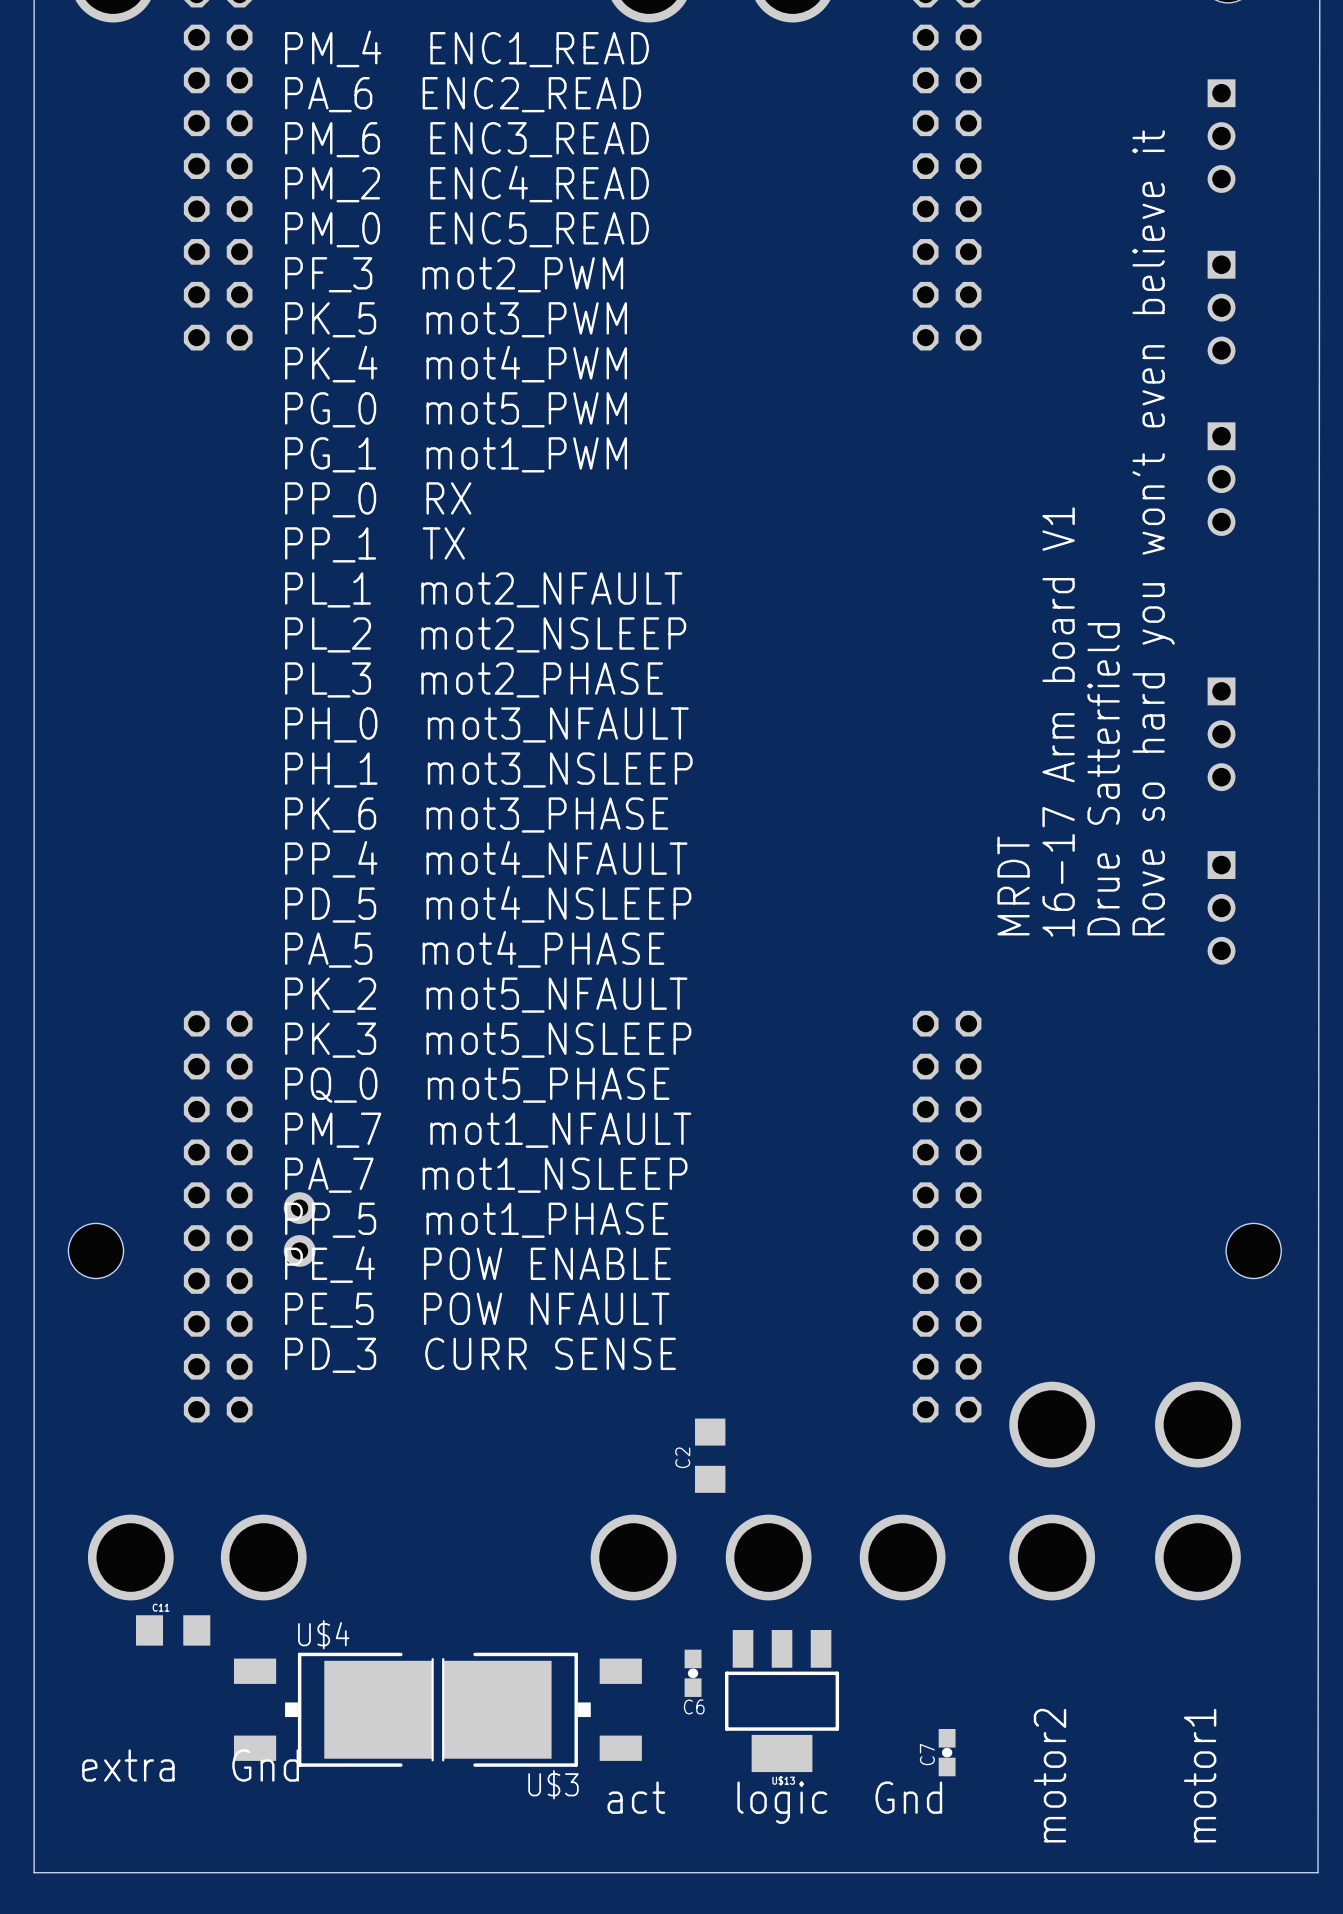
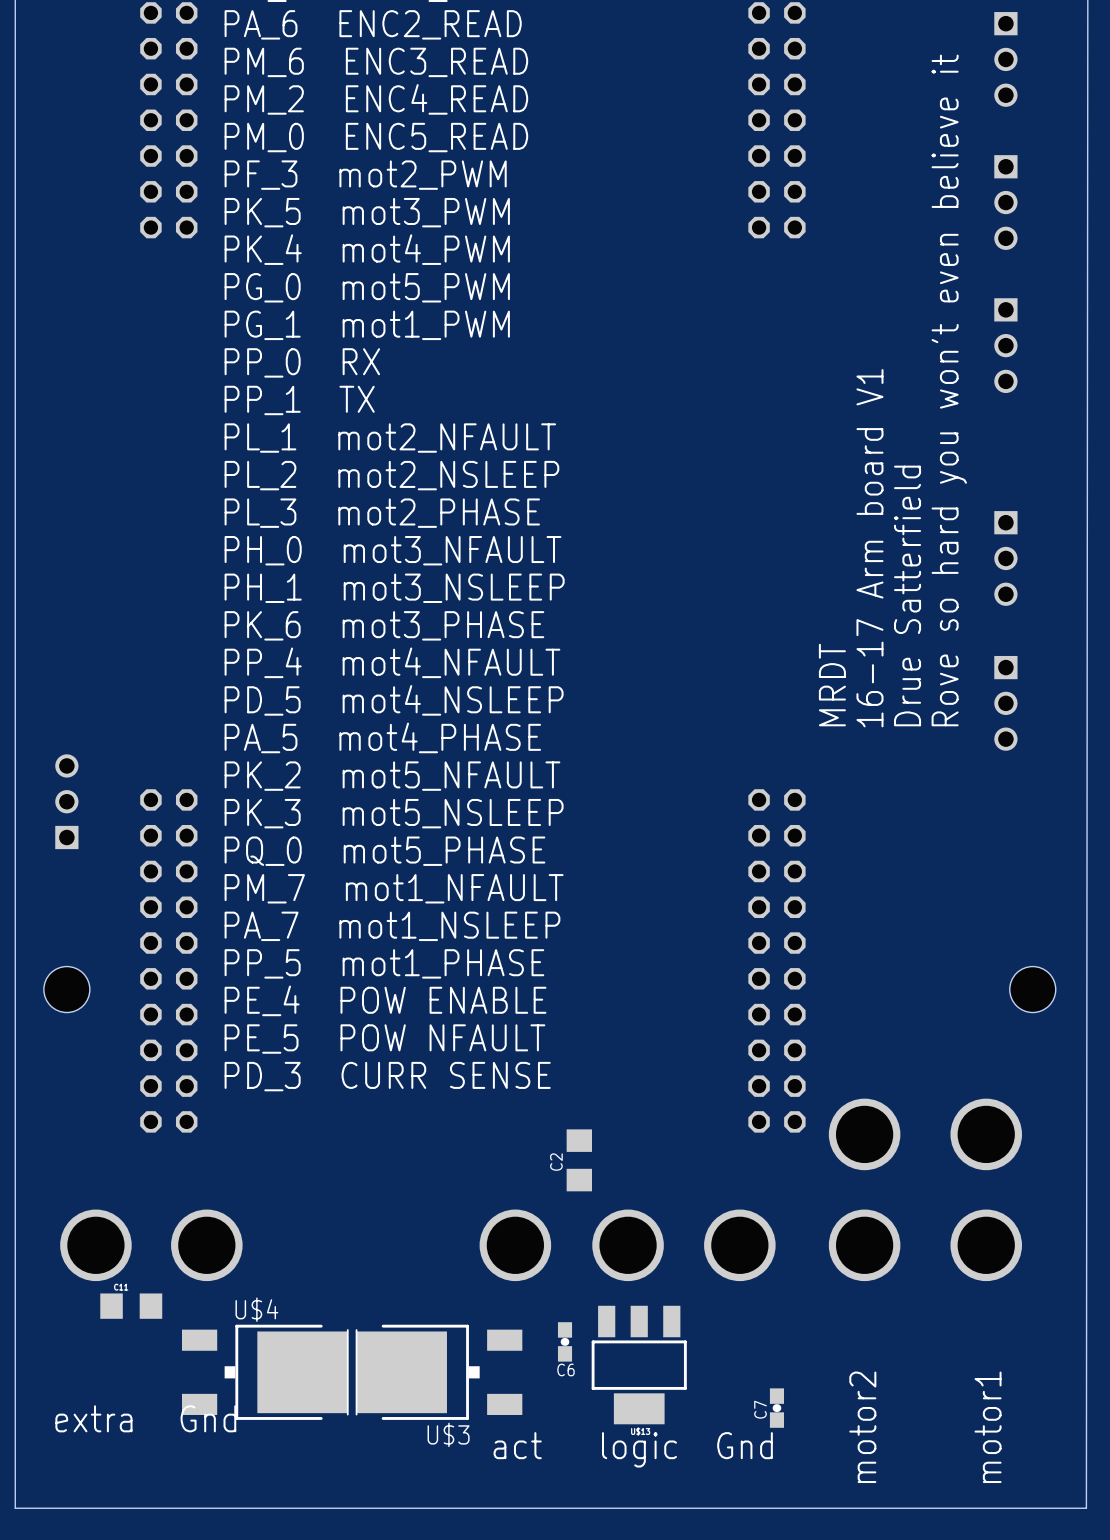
part: none -> (66, 801)
part: (299, 1229) -> none

